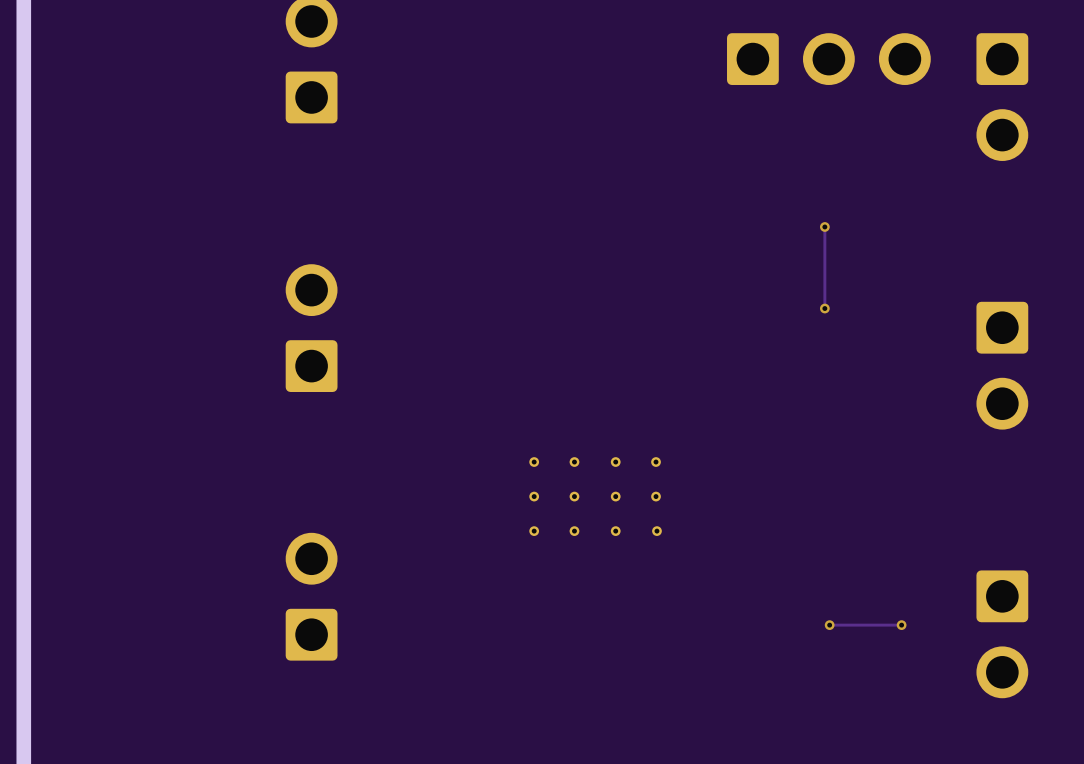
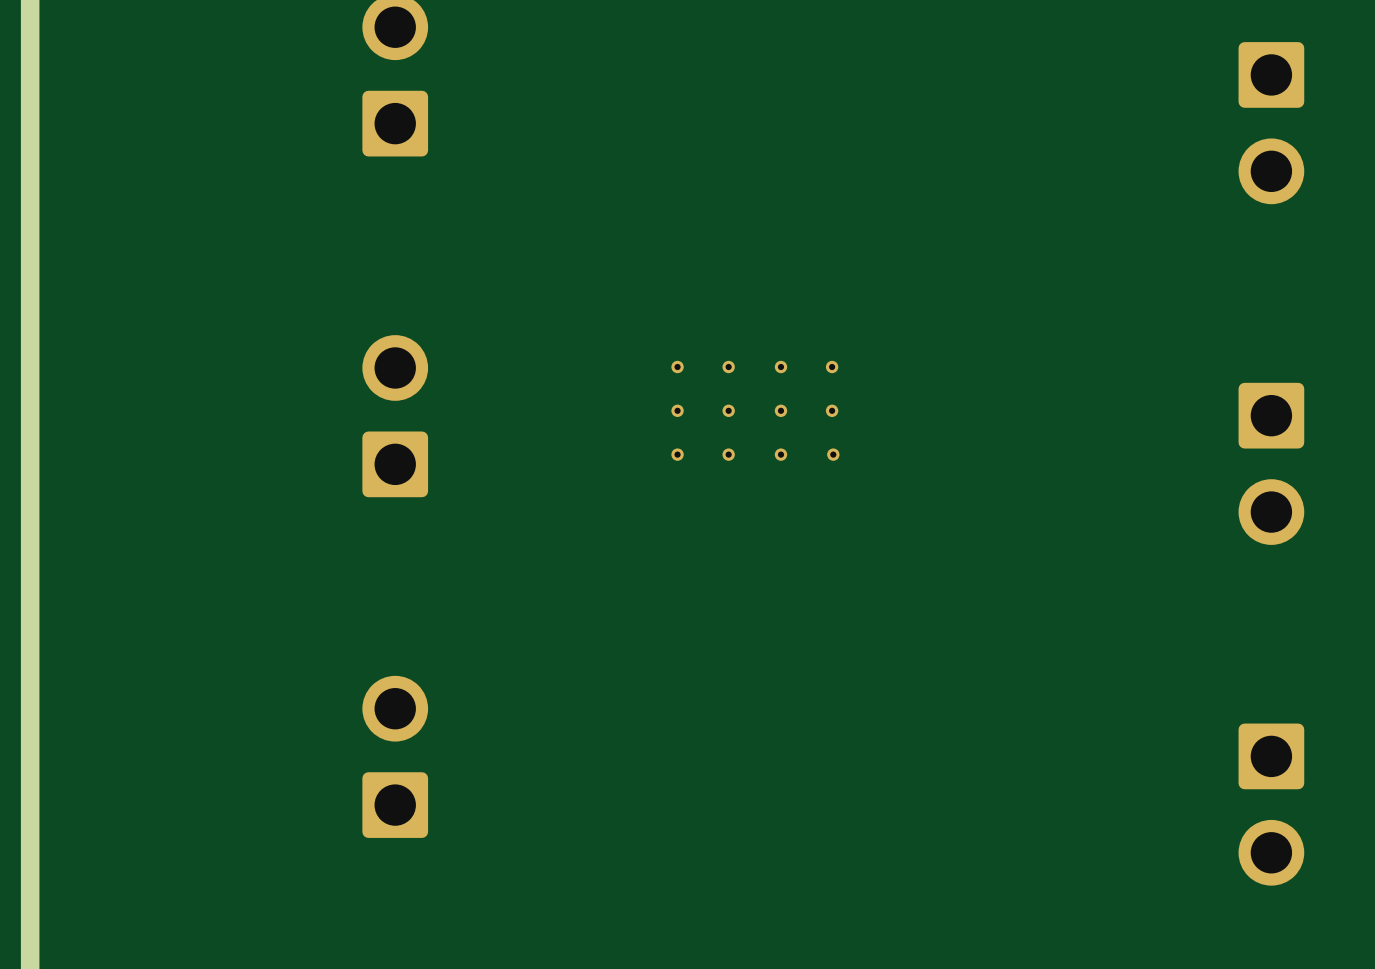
part: (828, 59) -> none
track: (824, 226) (824, 308) -> none
via: (824, 226) -> none
via: (824, 308) -> none
part position: (595, 496) -> (755, 410)
via: (829, 625) -> none
track: (901, 625) (829, 625) -> none
via: (901, 625) -> none

